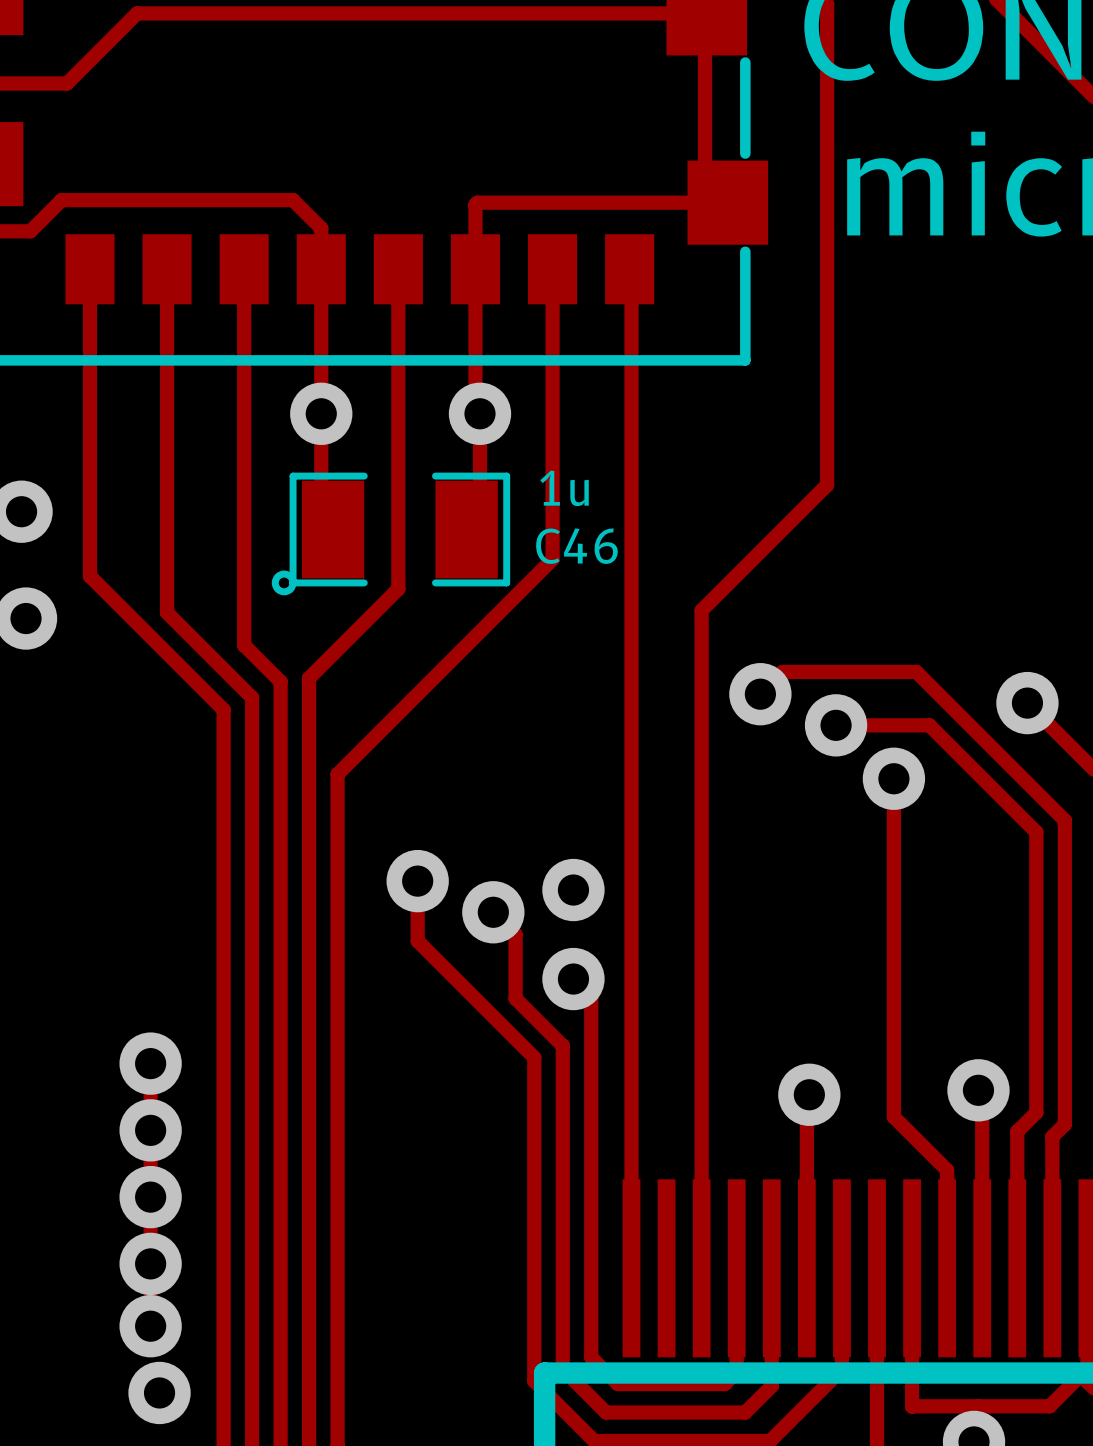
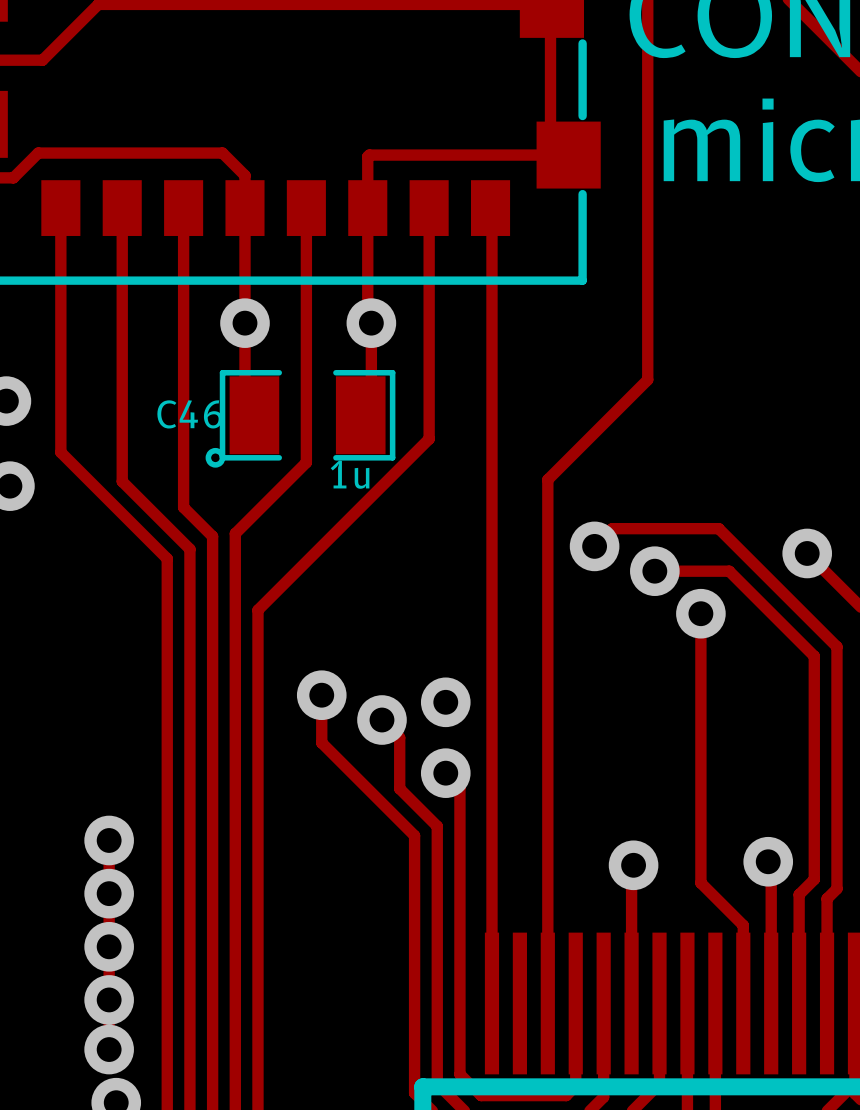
C46 value position: 1u (564, 488) -> 1u (350, 474)
C46 name position: C46 (576, 546) -> C46 (189, 414)

